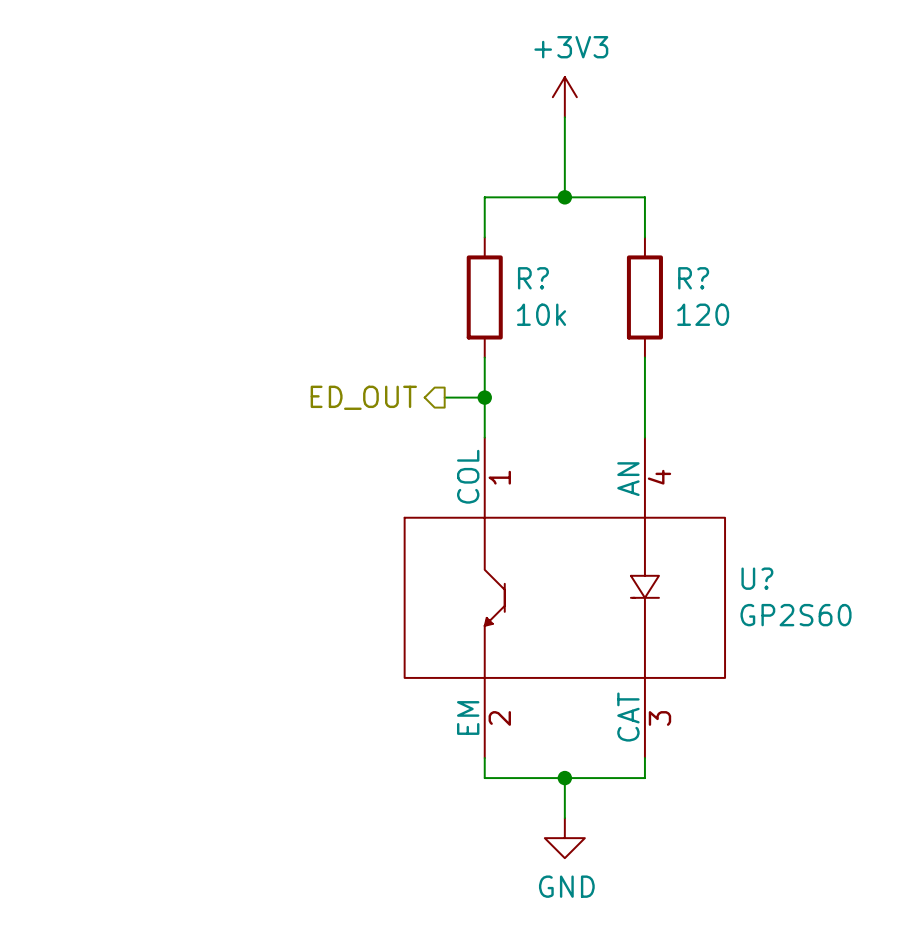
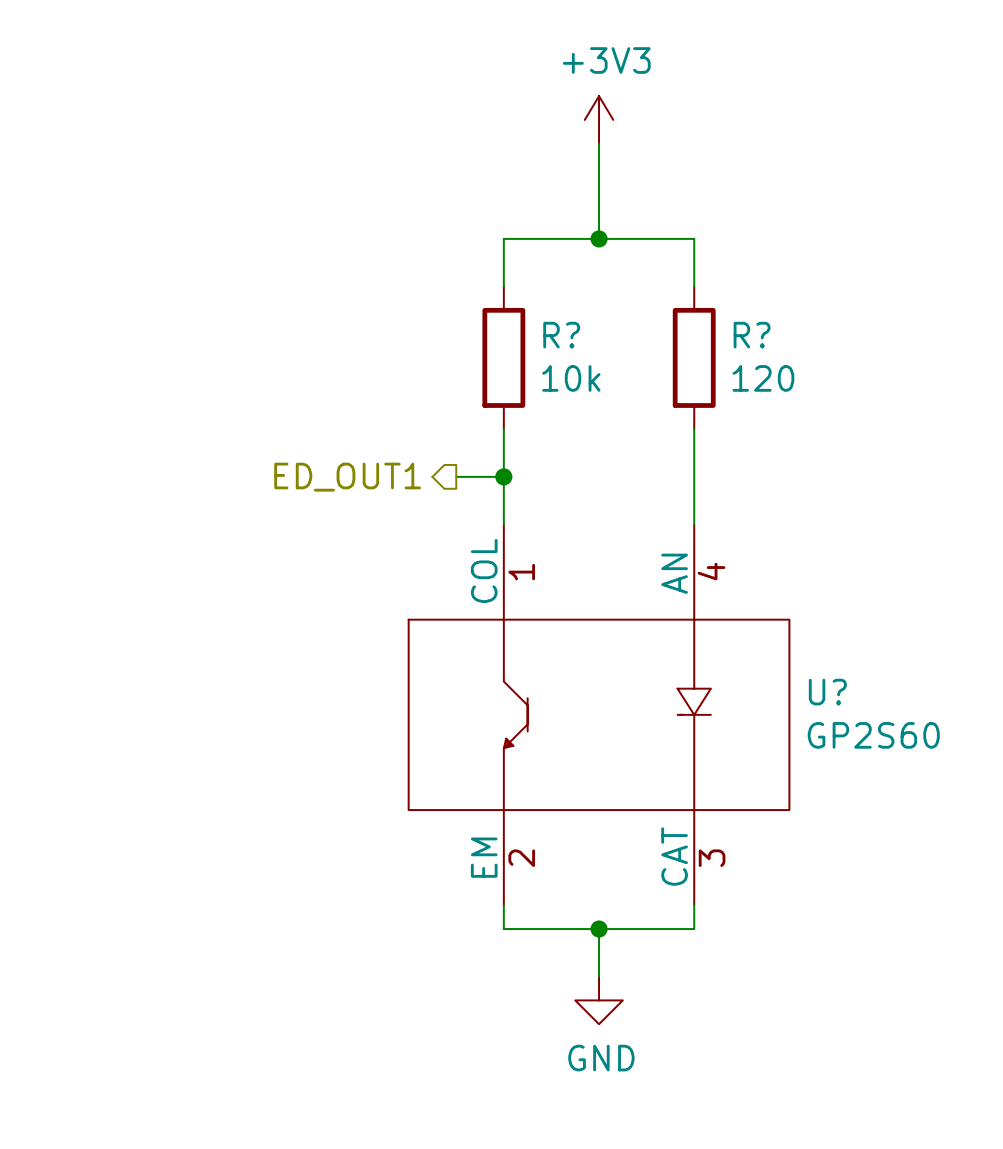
hierarchical label: ED_OUT (363, 397) -> ED_OUT1 (347, 477)

